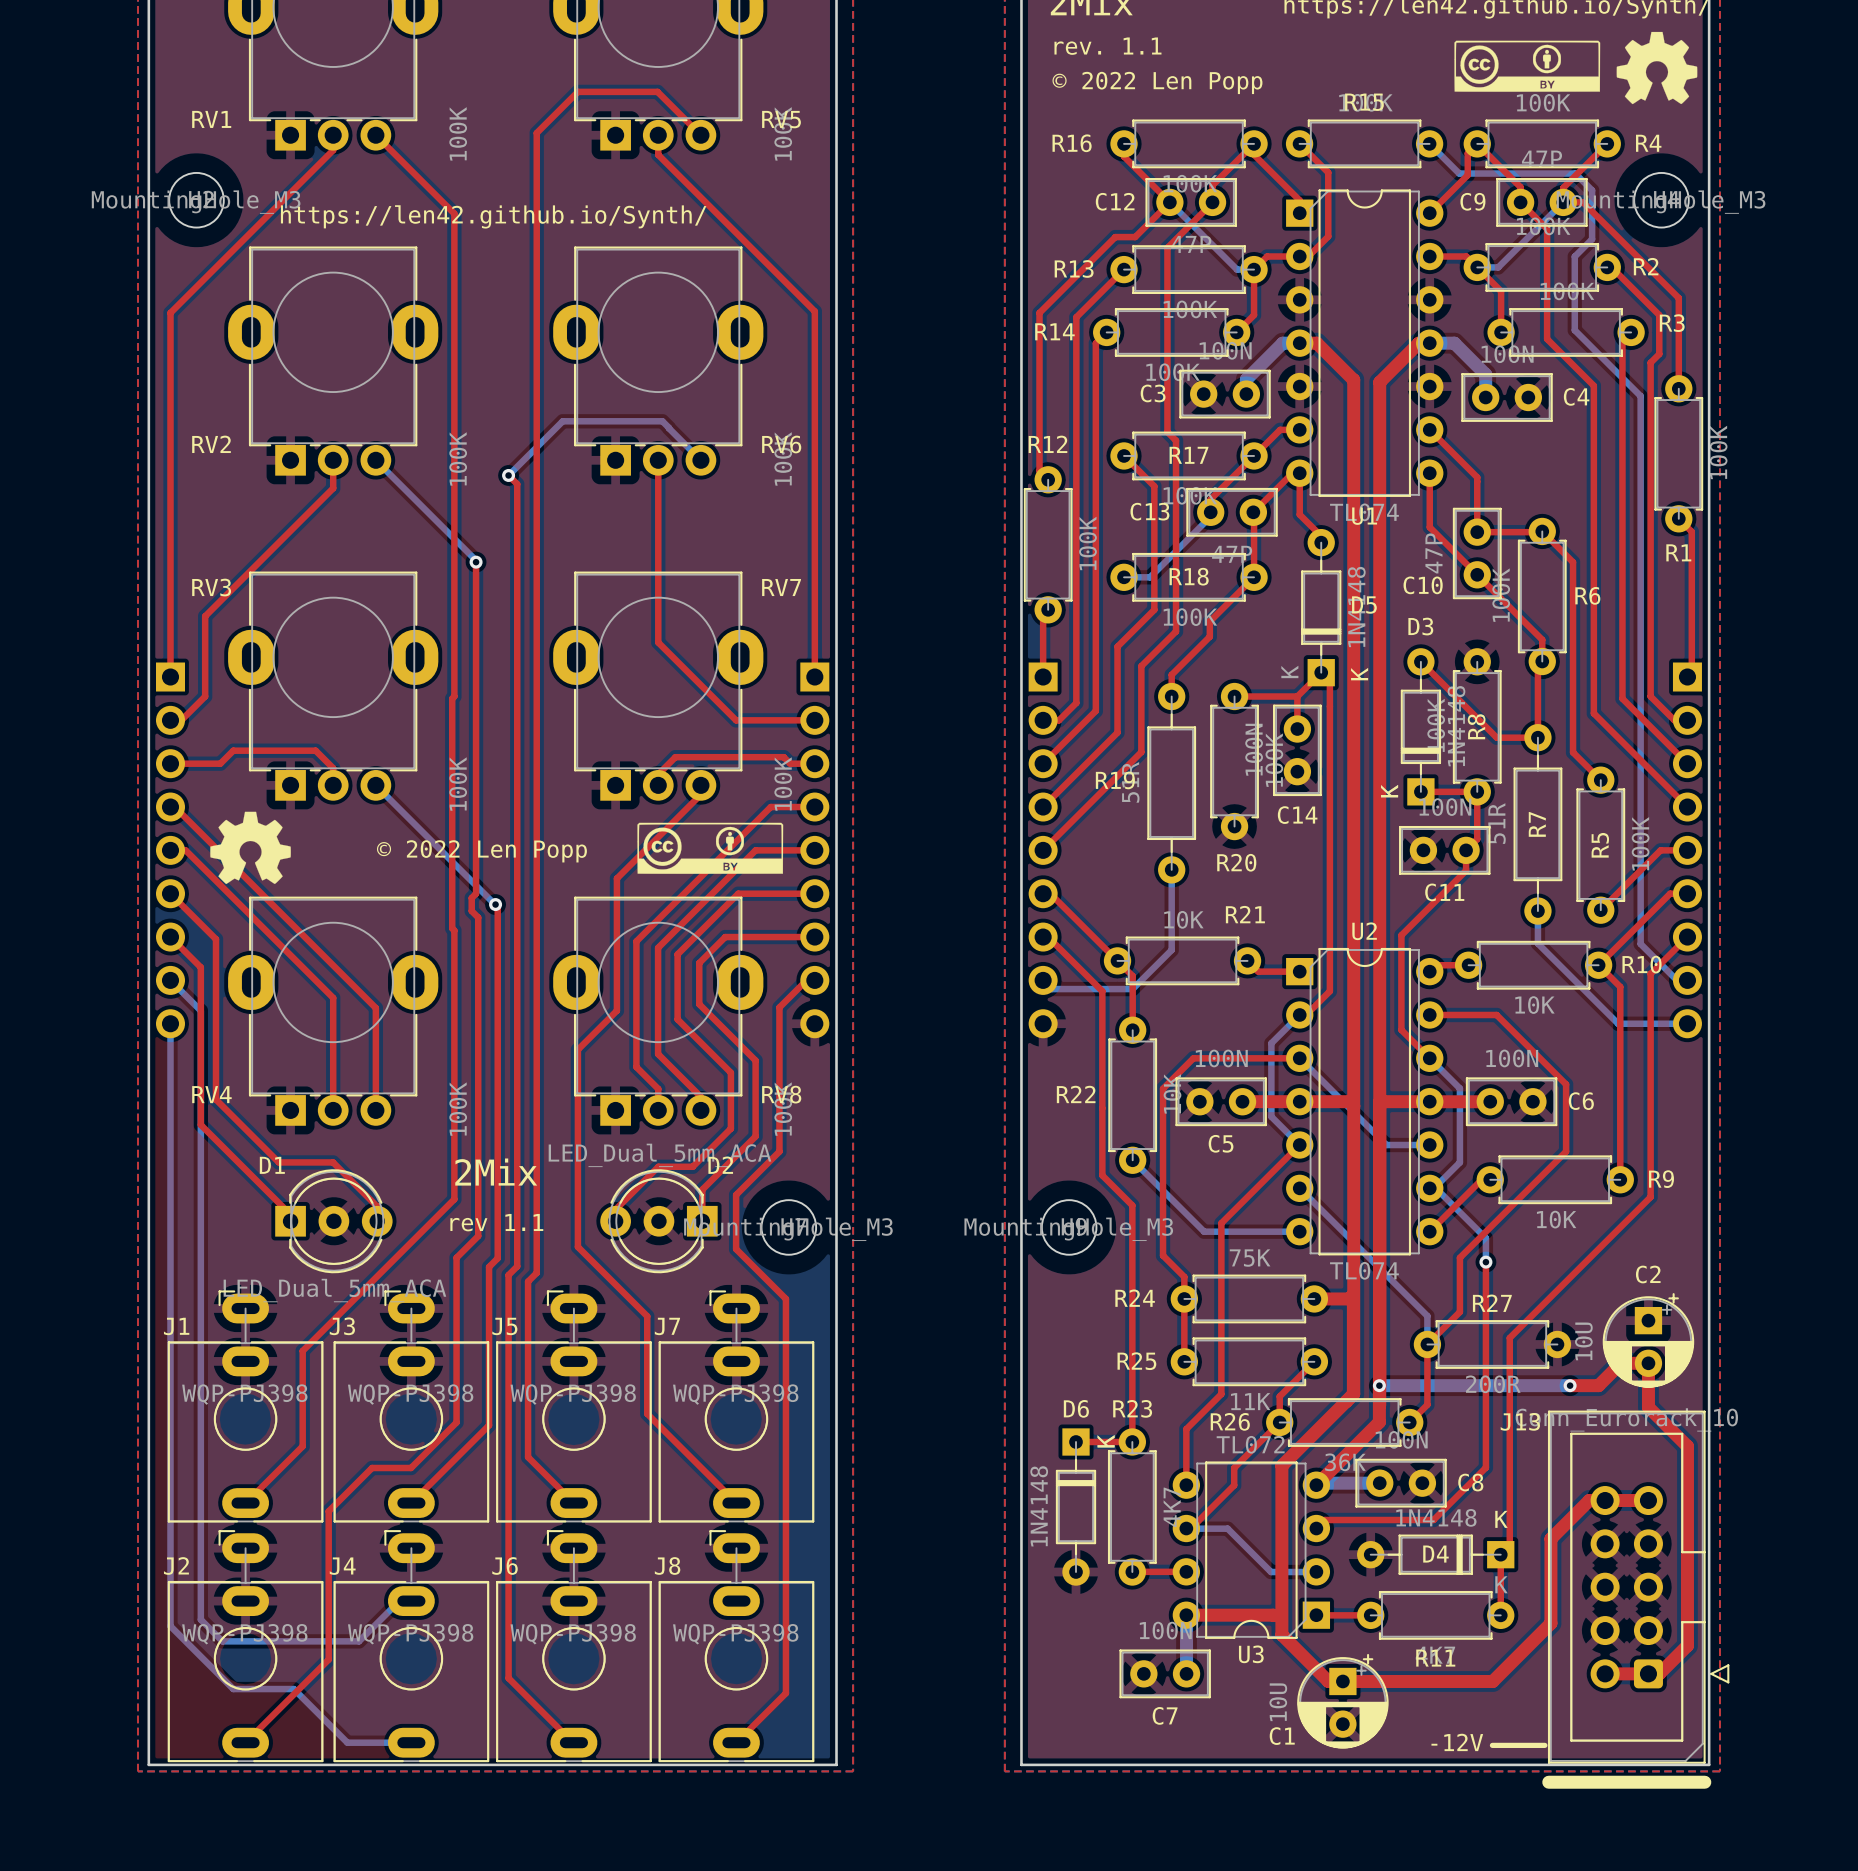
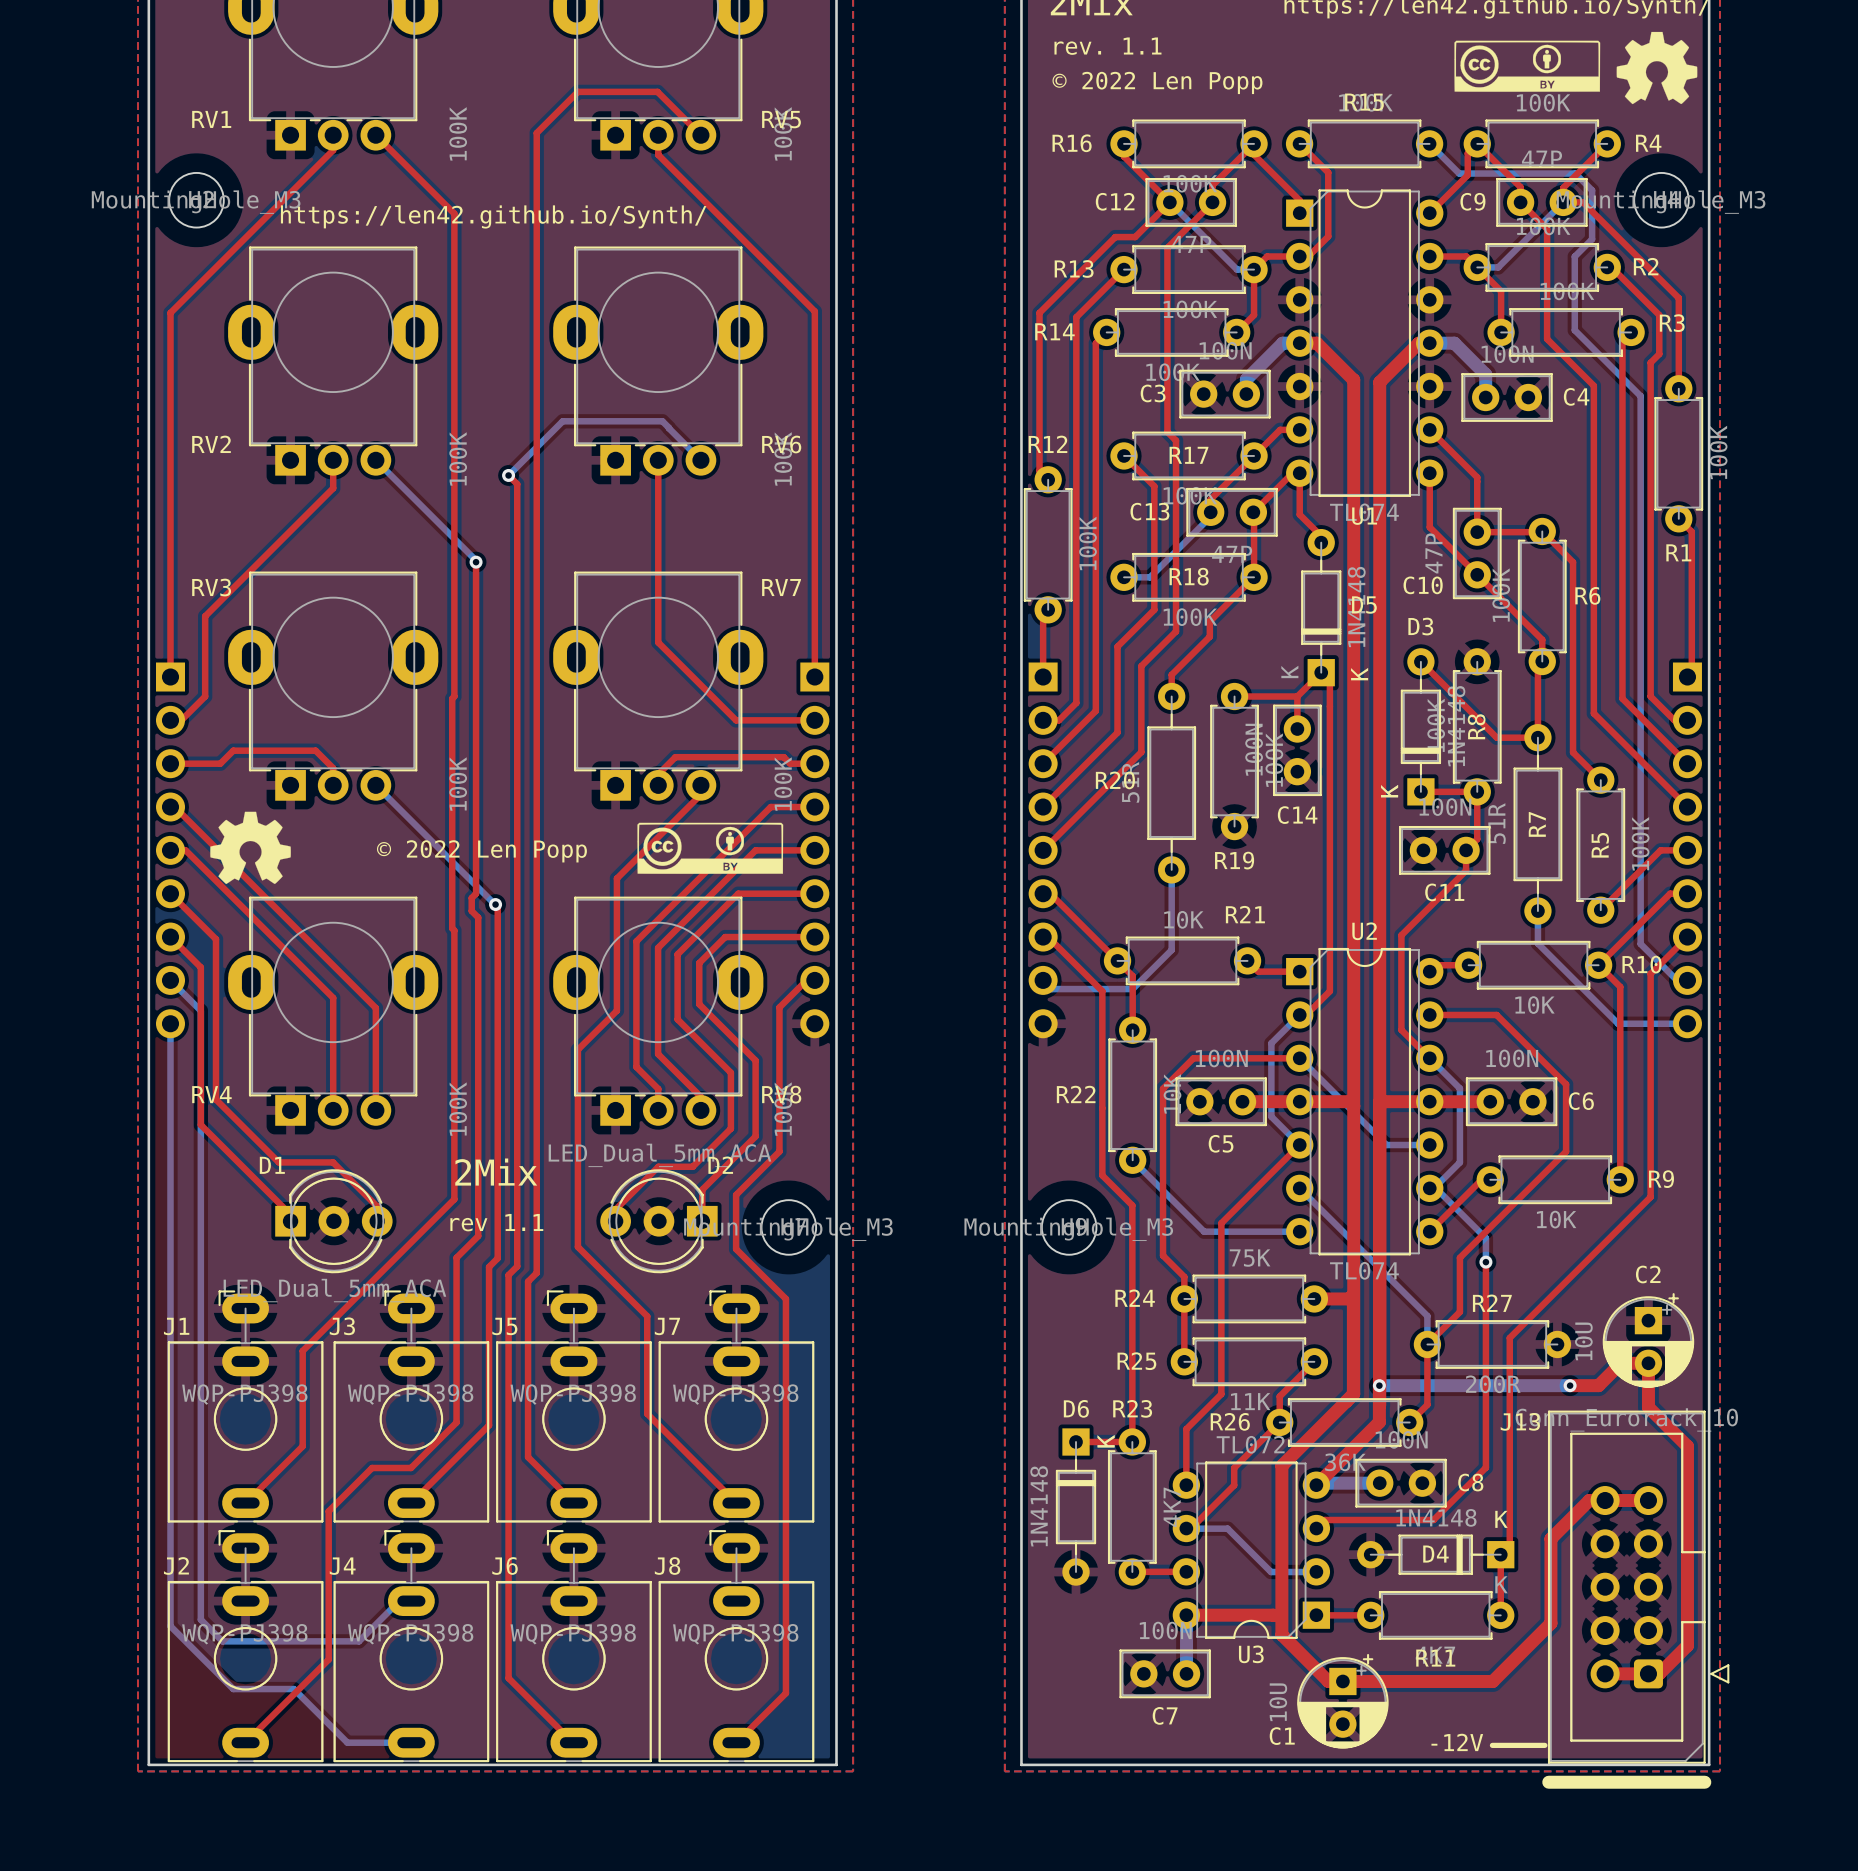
R19 name position: R19 (1115, 780) -> R19 (1234, 860)
R20 name position: R20 (1236, 862) -> R20 (1115, 780)

